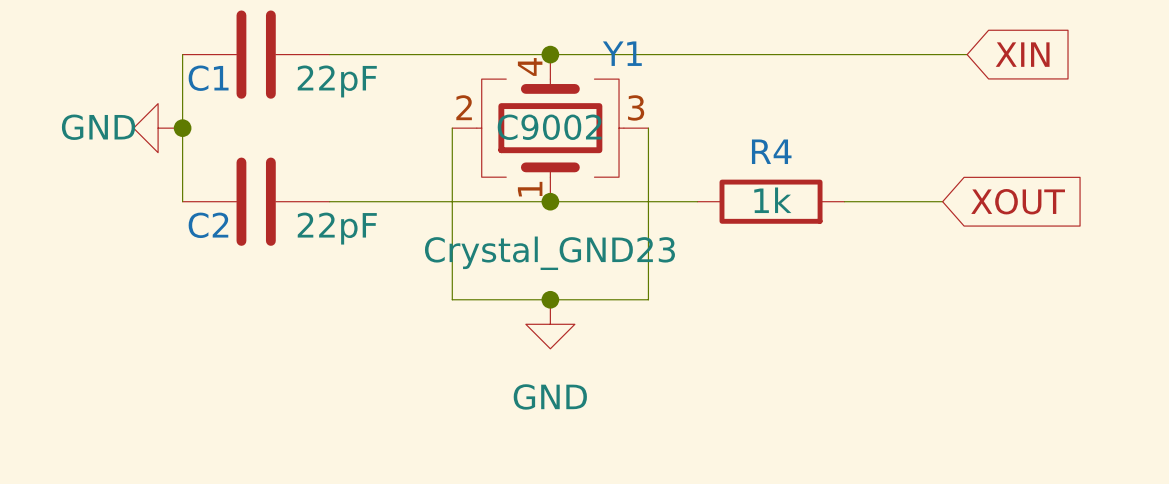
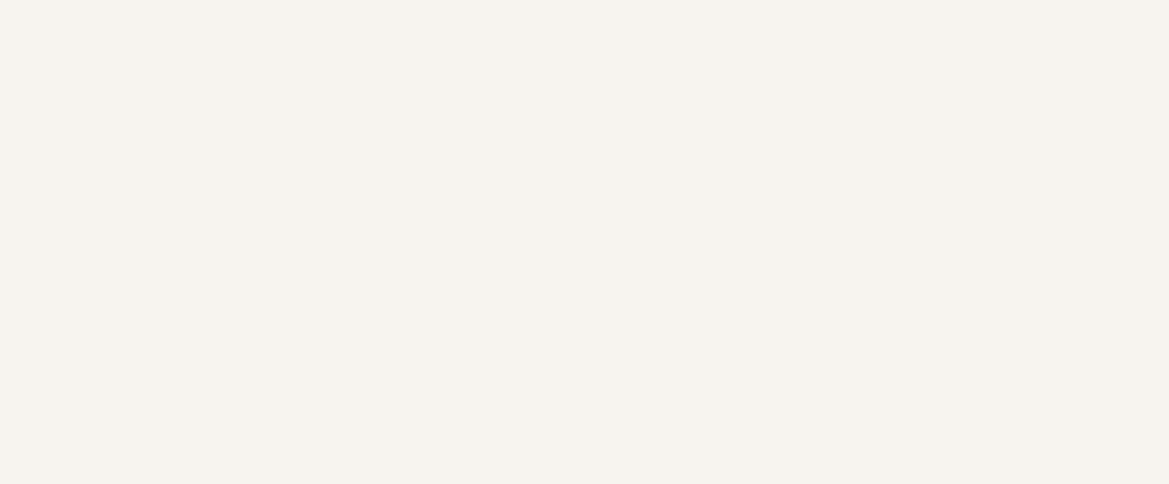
wire: (182, 54) (182, 201) -> none
C1: 22pF (256, 54) -> none
wire: (329, 54) (967, 54) -> none
junction: (550, 54) -> none
global label: XIN (1022, 54) -> none
power symbol: GND (158, 128) -> none
junction: (182, 128) -> none
wire: (452, 128) (452, 299) (648, 299) (648, 128) -> none
Y1: Crystal_GND23 (550, 128) -> none
C2: 22pF (256, 201) -> none
wire: (329, 201) (697, 201) -> none
junction: (550, 201) -> none
R4: 1k (771, 201) -> none
wire: (844, 201) (942, 201) -> none
global label: XOUT (1018, 201) -> none
junction: (550, 299) -> none
power symbol: GND (550, 324) -> none

